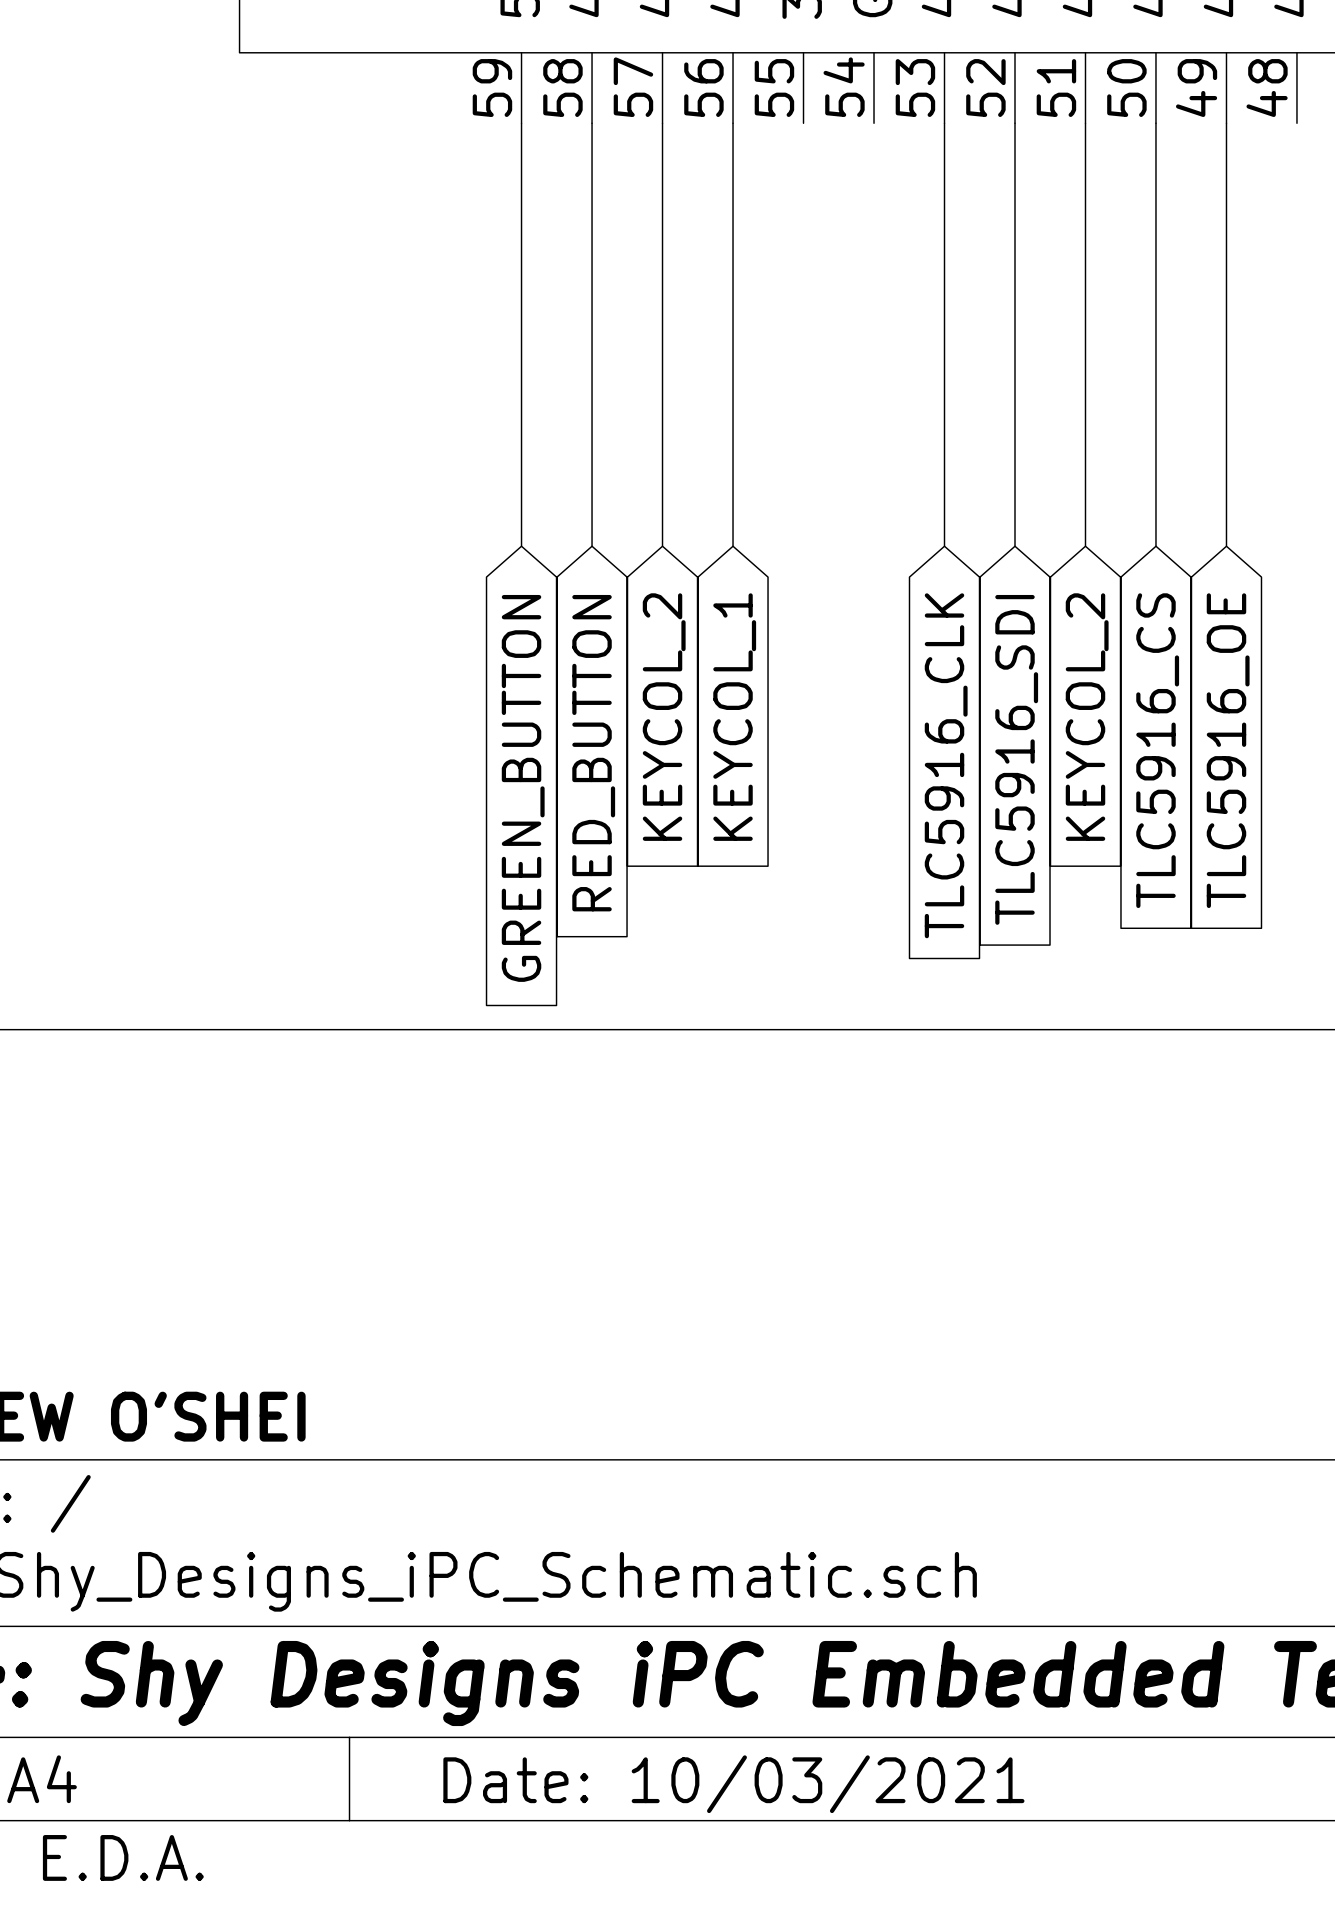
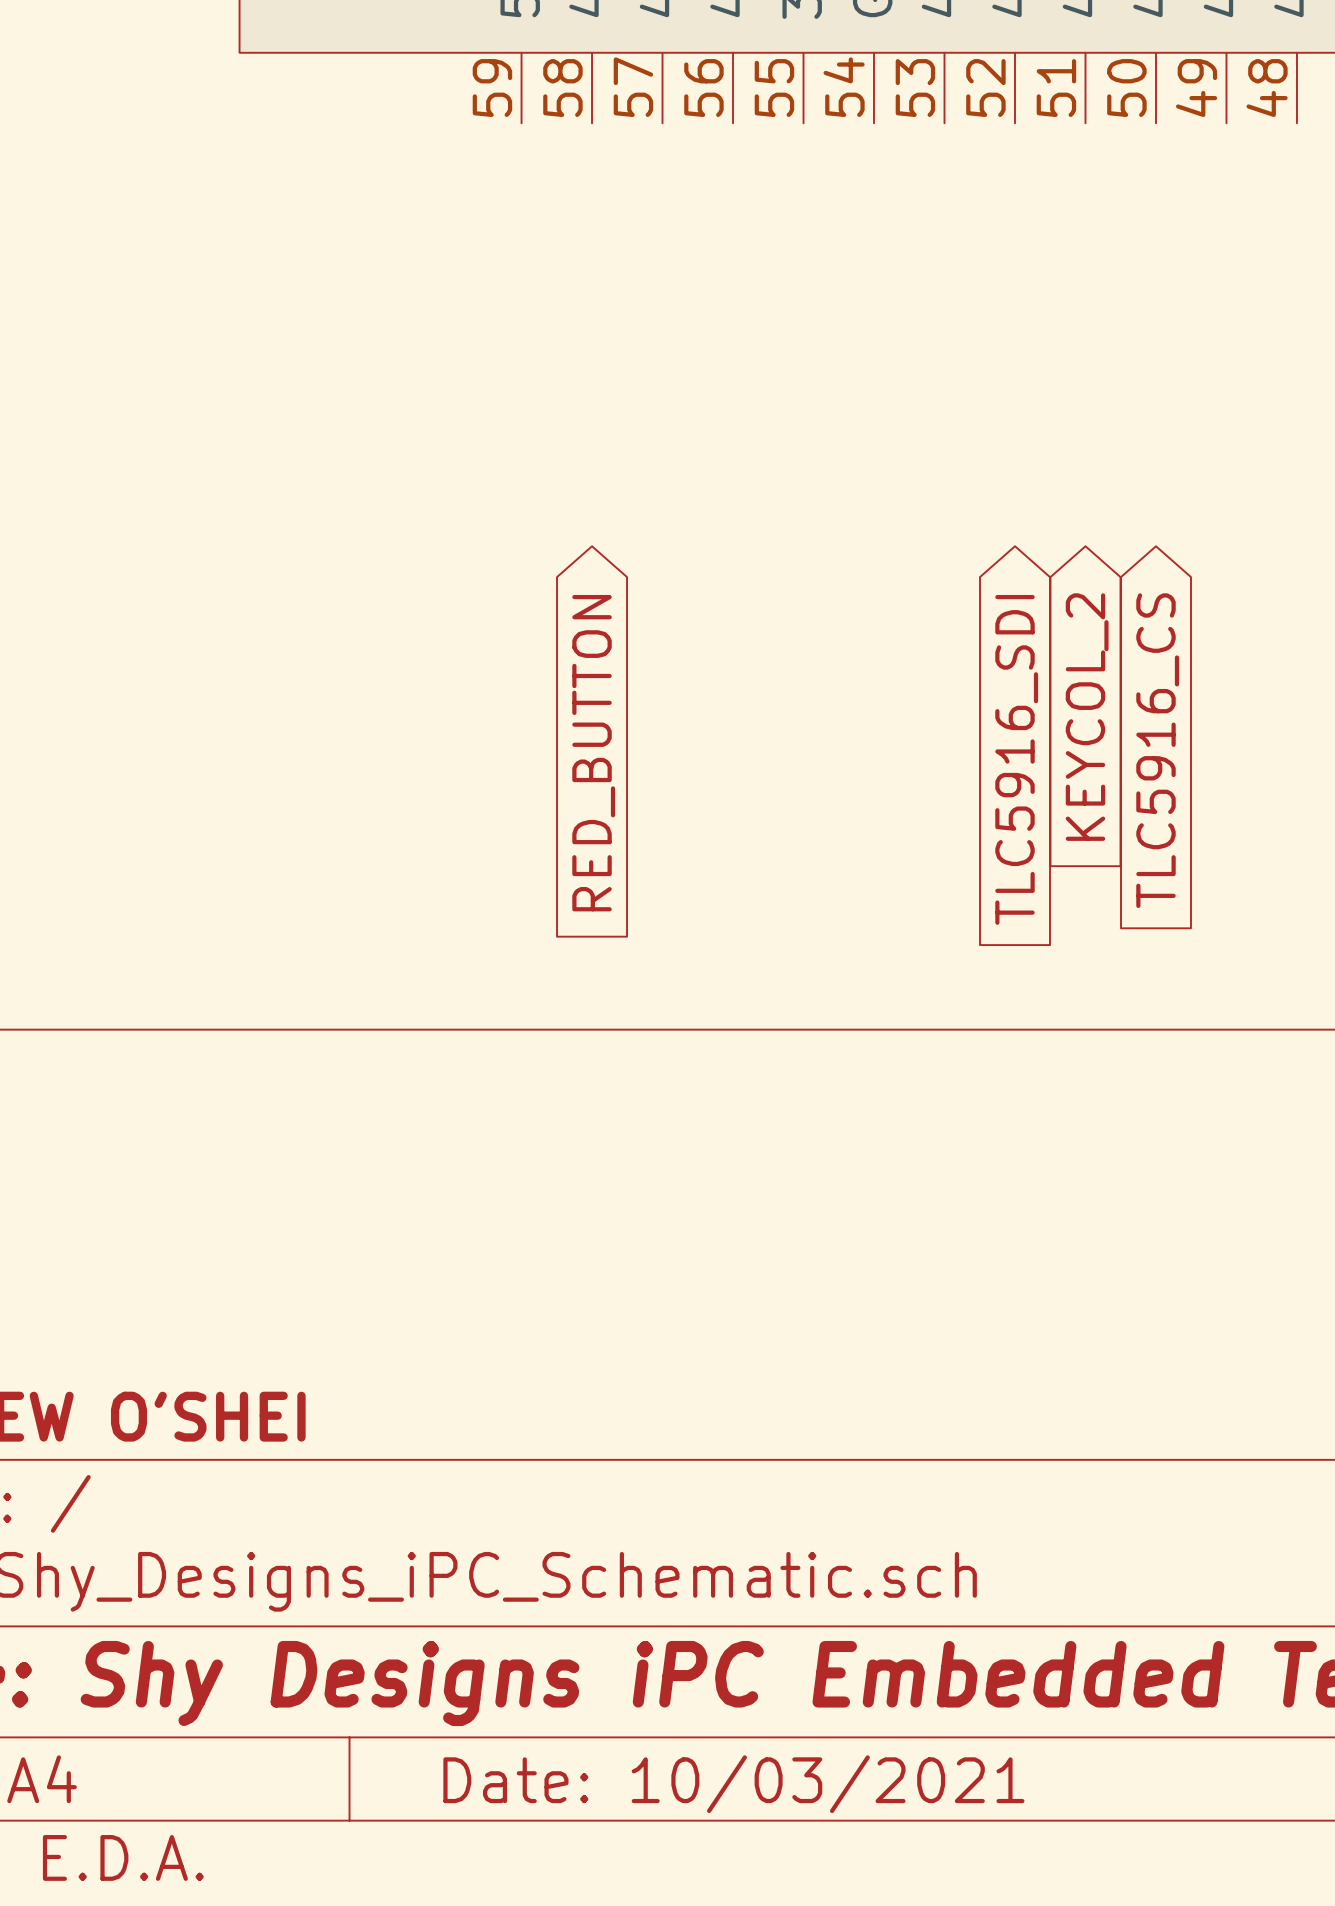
wire: (521, 123) (521, 546) -> none
wire: (592, 123) (592, 546) -> none
wire: (662, 123) (662, 546) -> none
wire: (733, 123) (733, 546) -> none
wire: (944, 123) (944, 546) -> none
wire: (1014, 123) (1014, 546) -> none
wire: (1085, 123) (1085, 546) -> none
wire: (1155, 123) (1155, 546) -> none
wire: (1226, 123) (1226, 546) -> none
global label: KEYCOL_2 (664, 717) -> none
global label: KEYCOL_1 (734, 717) -> none
global label: TLC5916_OE (1228, 750) -> none
global label: TLC5916_CLK (946, 765) -> none
global label: GREEN_BUTTON (523, 788) -> none

